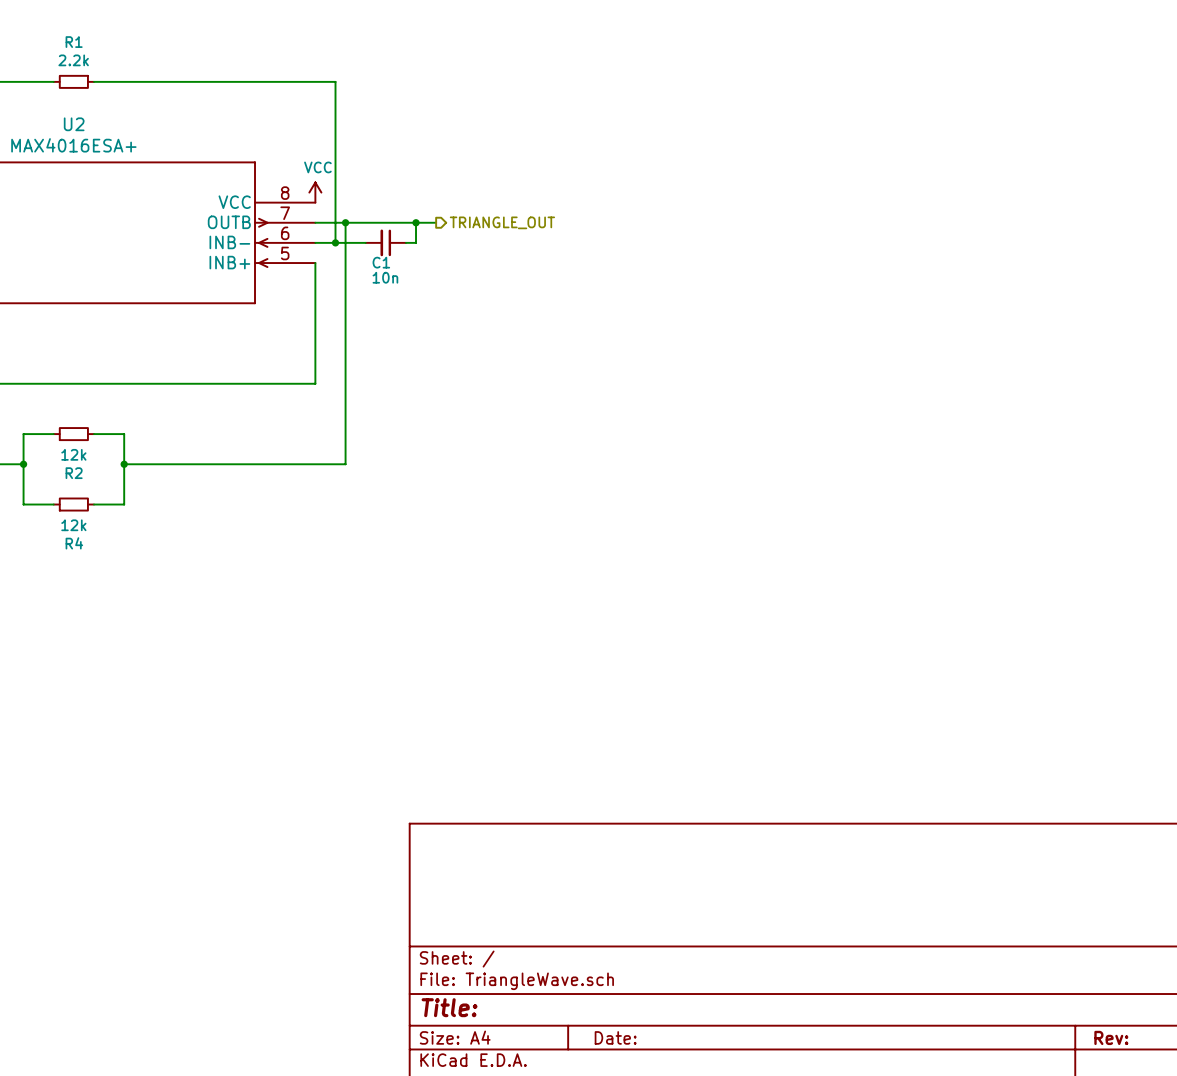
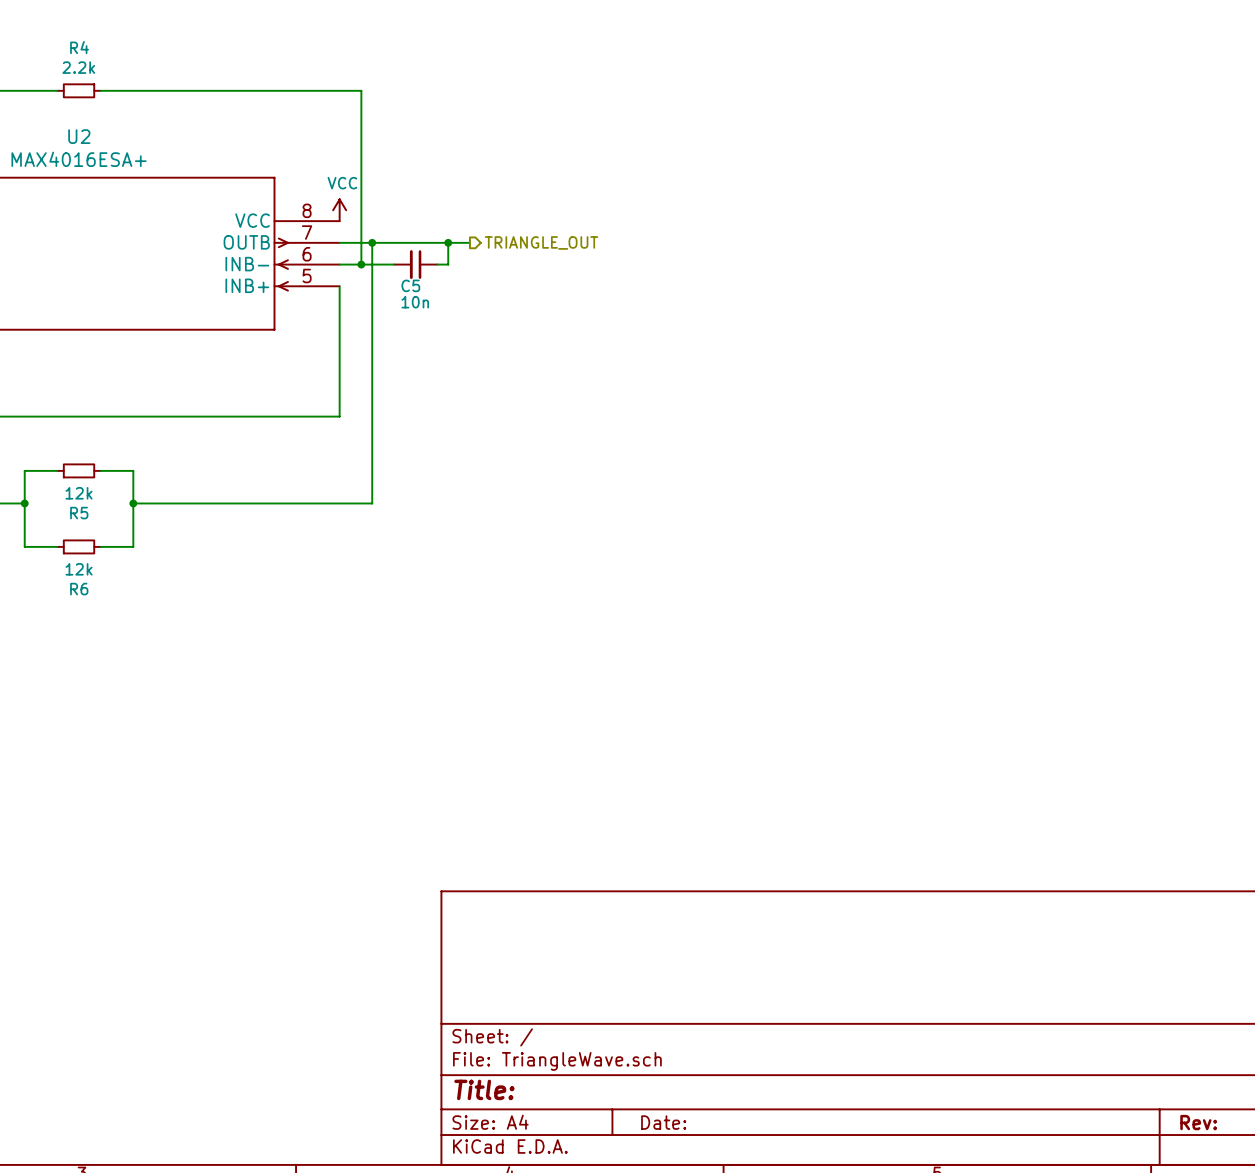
R1 name: R1 (74, 42) -> R4 (79, 47)
C1 name: C1 (381, 262) -> C5 (410, 285)
R2 name: R2 (74, 473) -> R5 (79, 513)
R4 name: R4 (74, 543) -> R6 (79, 589)

